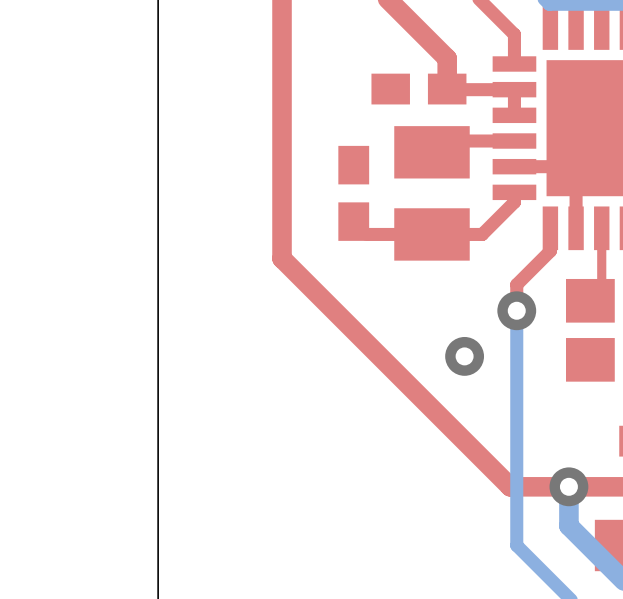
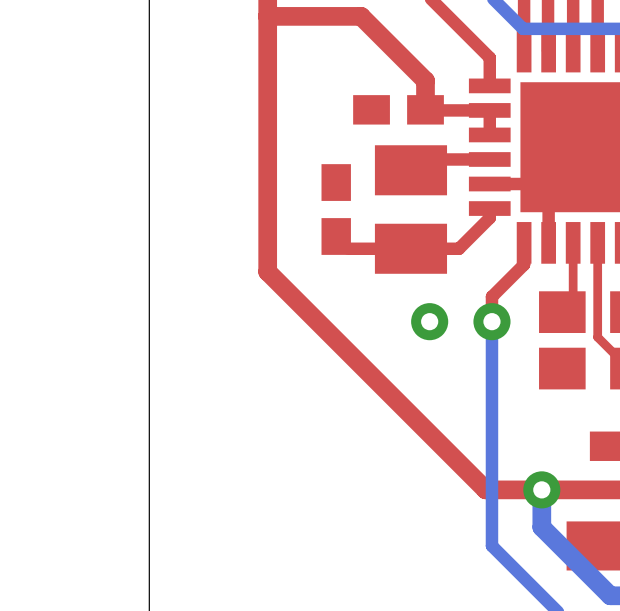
via position: (464, 356) -> (429, 321)

